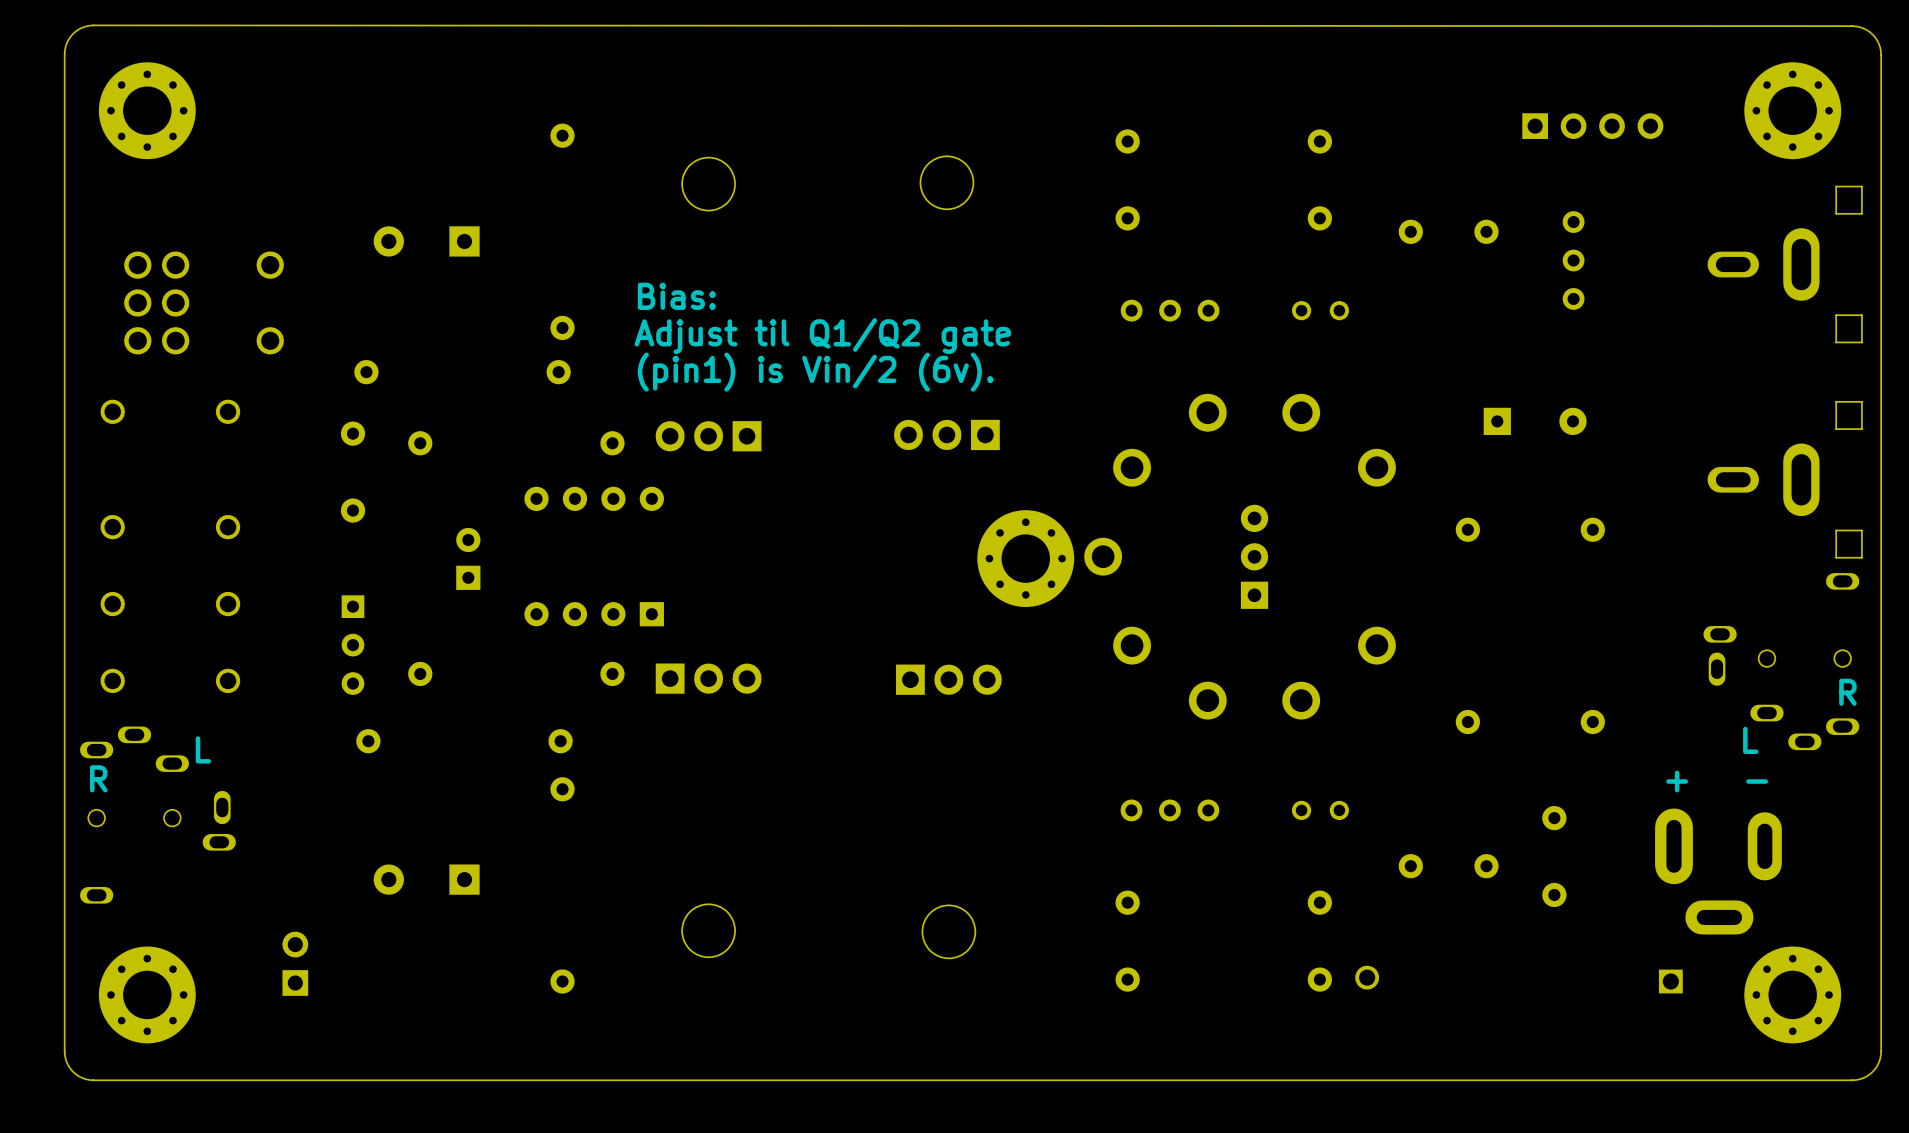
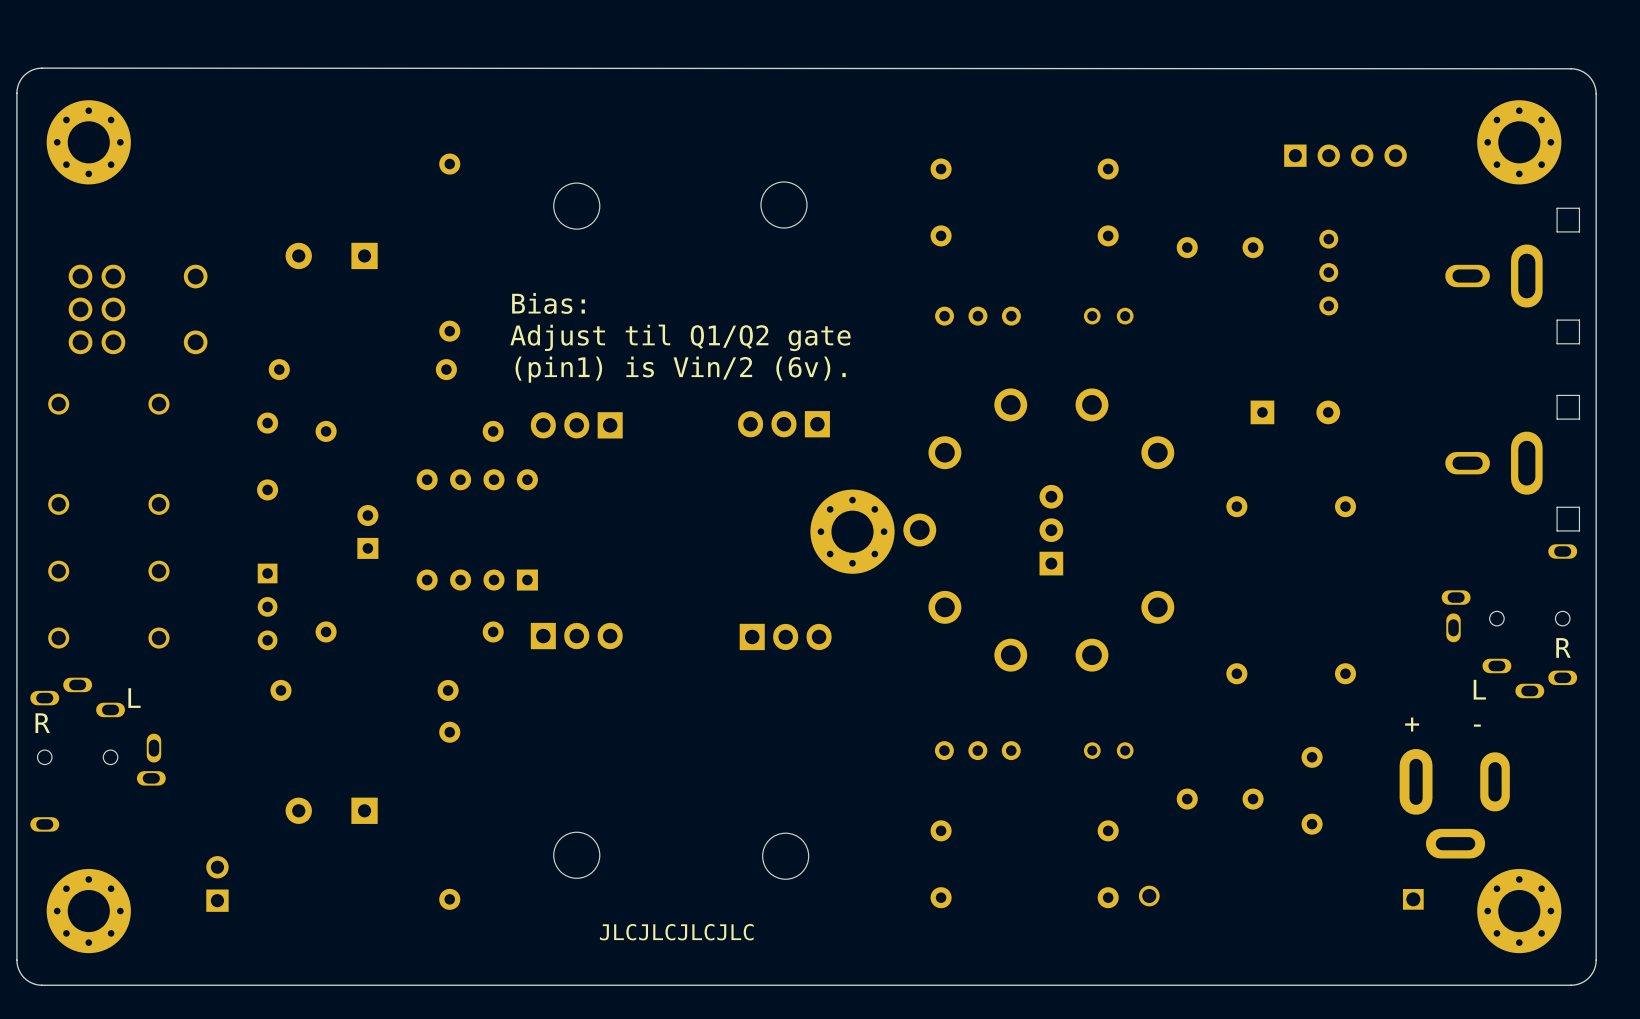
text: none -> JLCJLCJLCJLC (676, 932)

